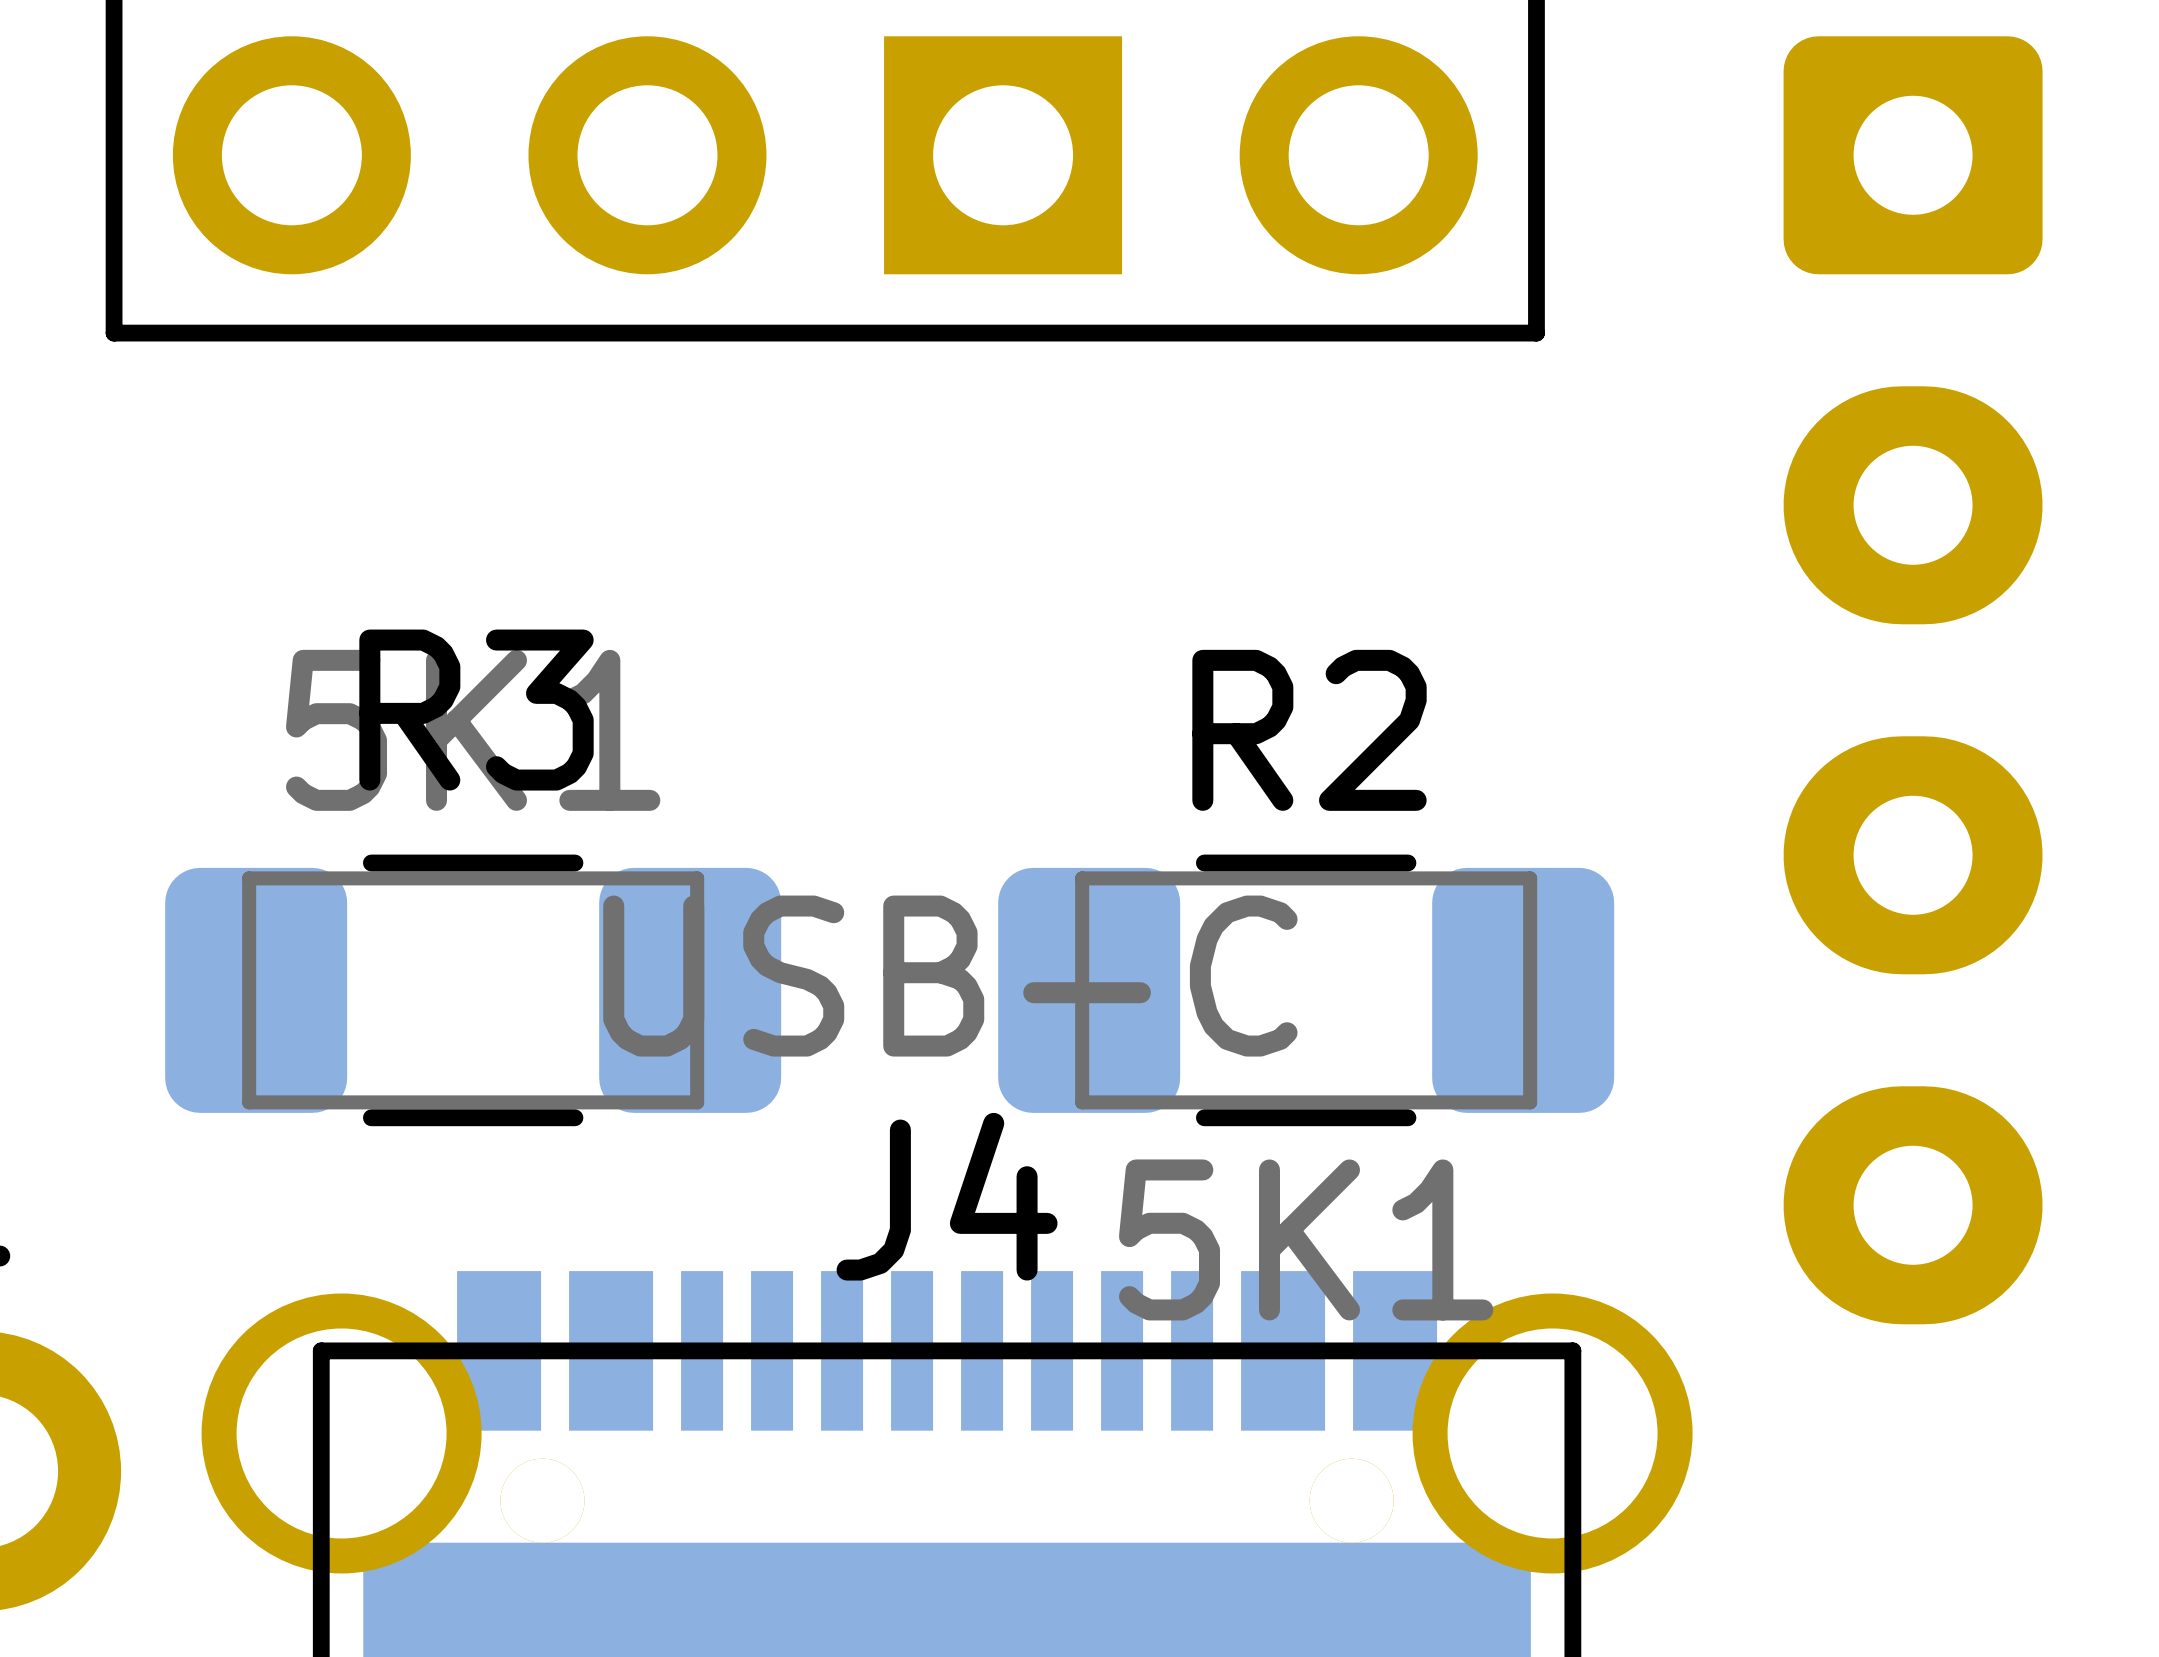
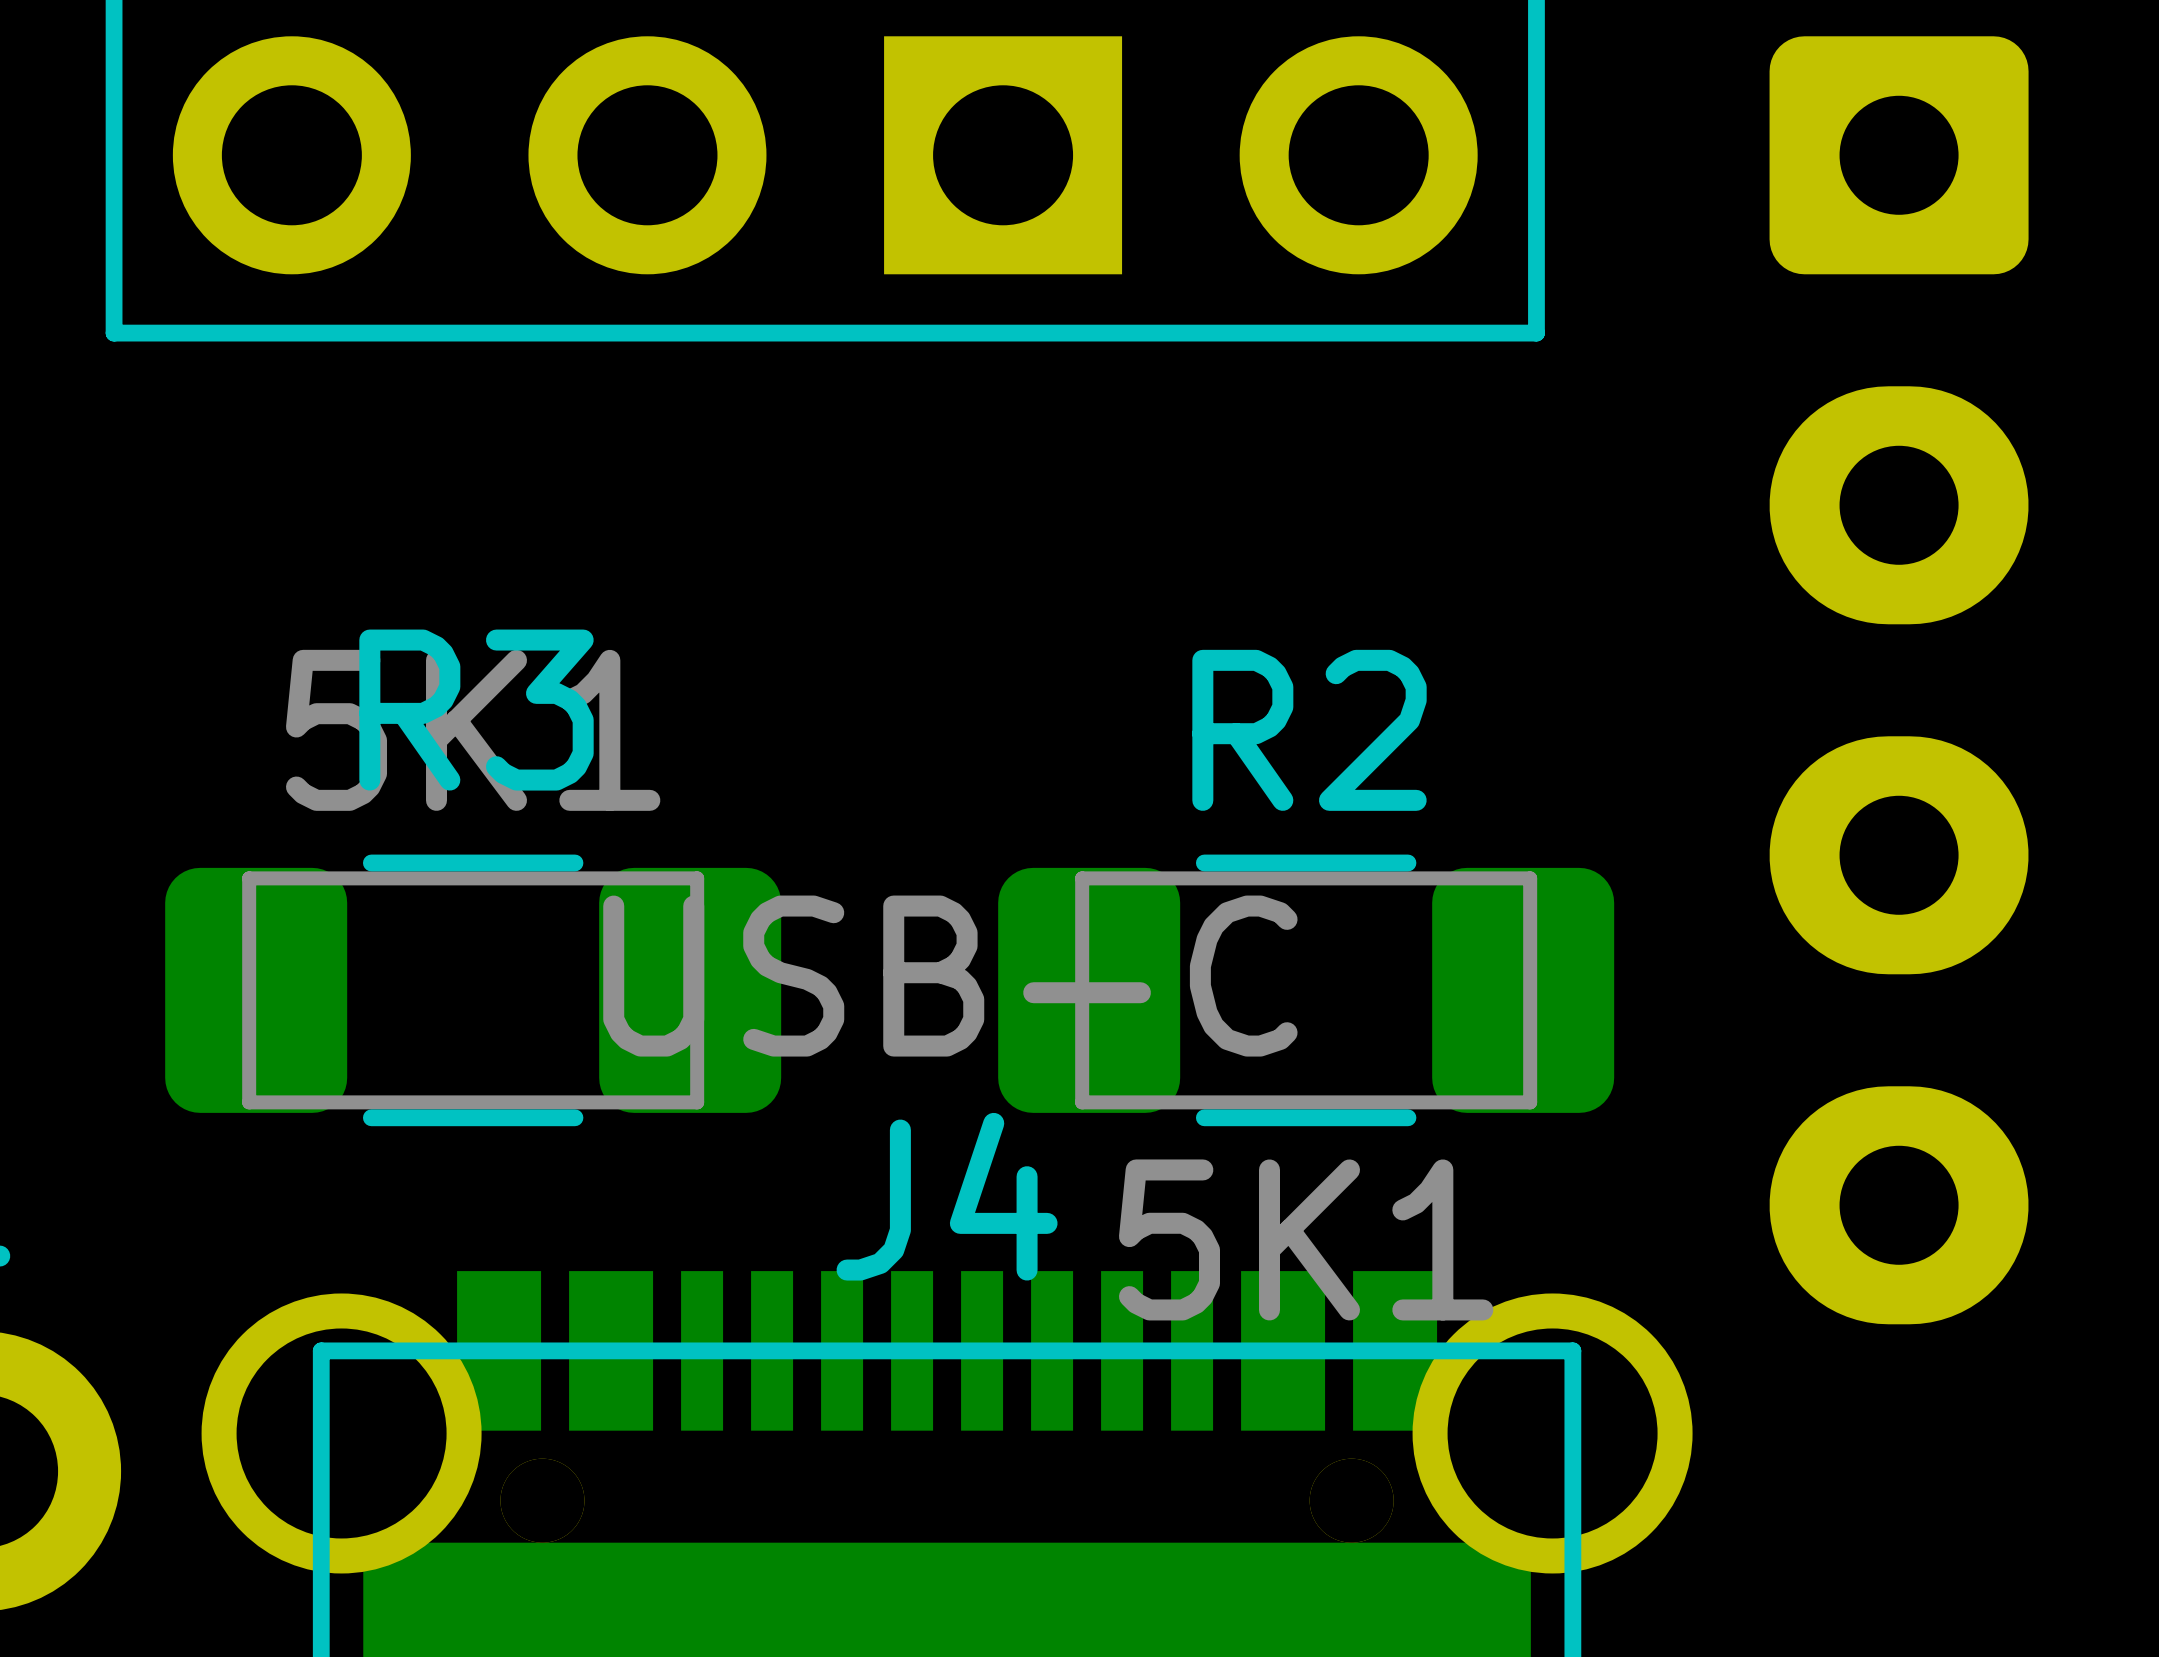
part position: (1913, 680) -> (1899, 680)

